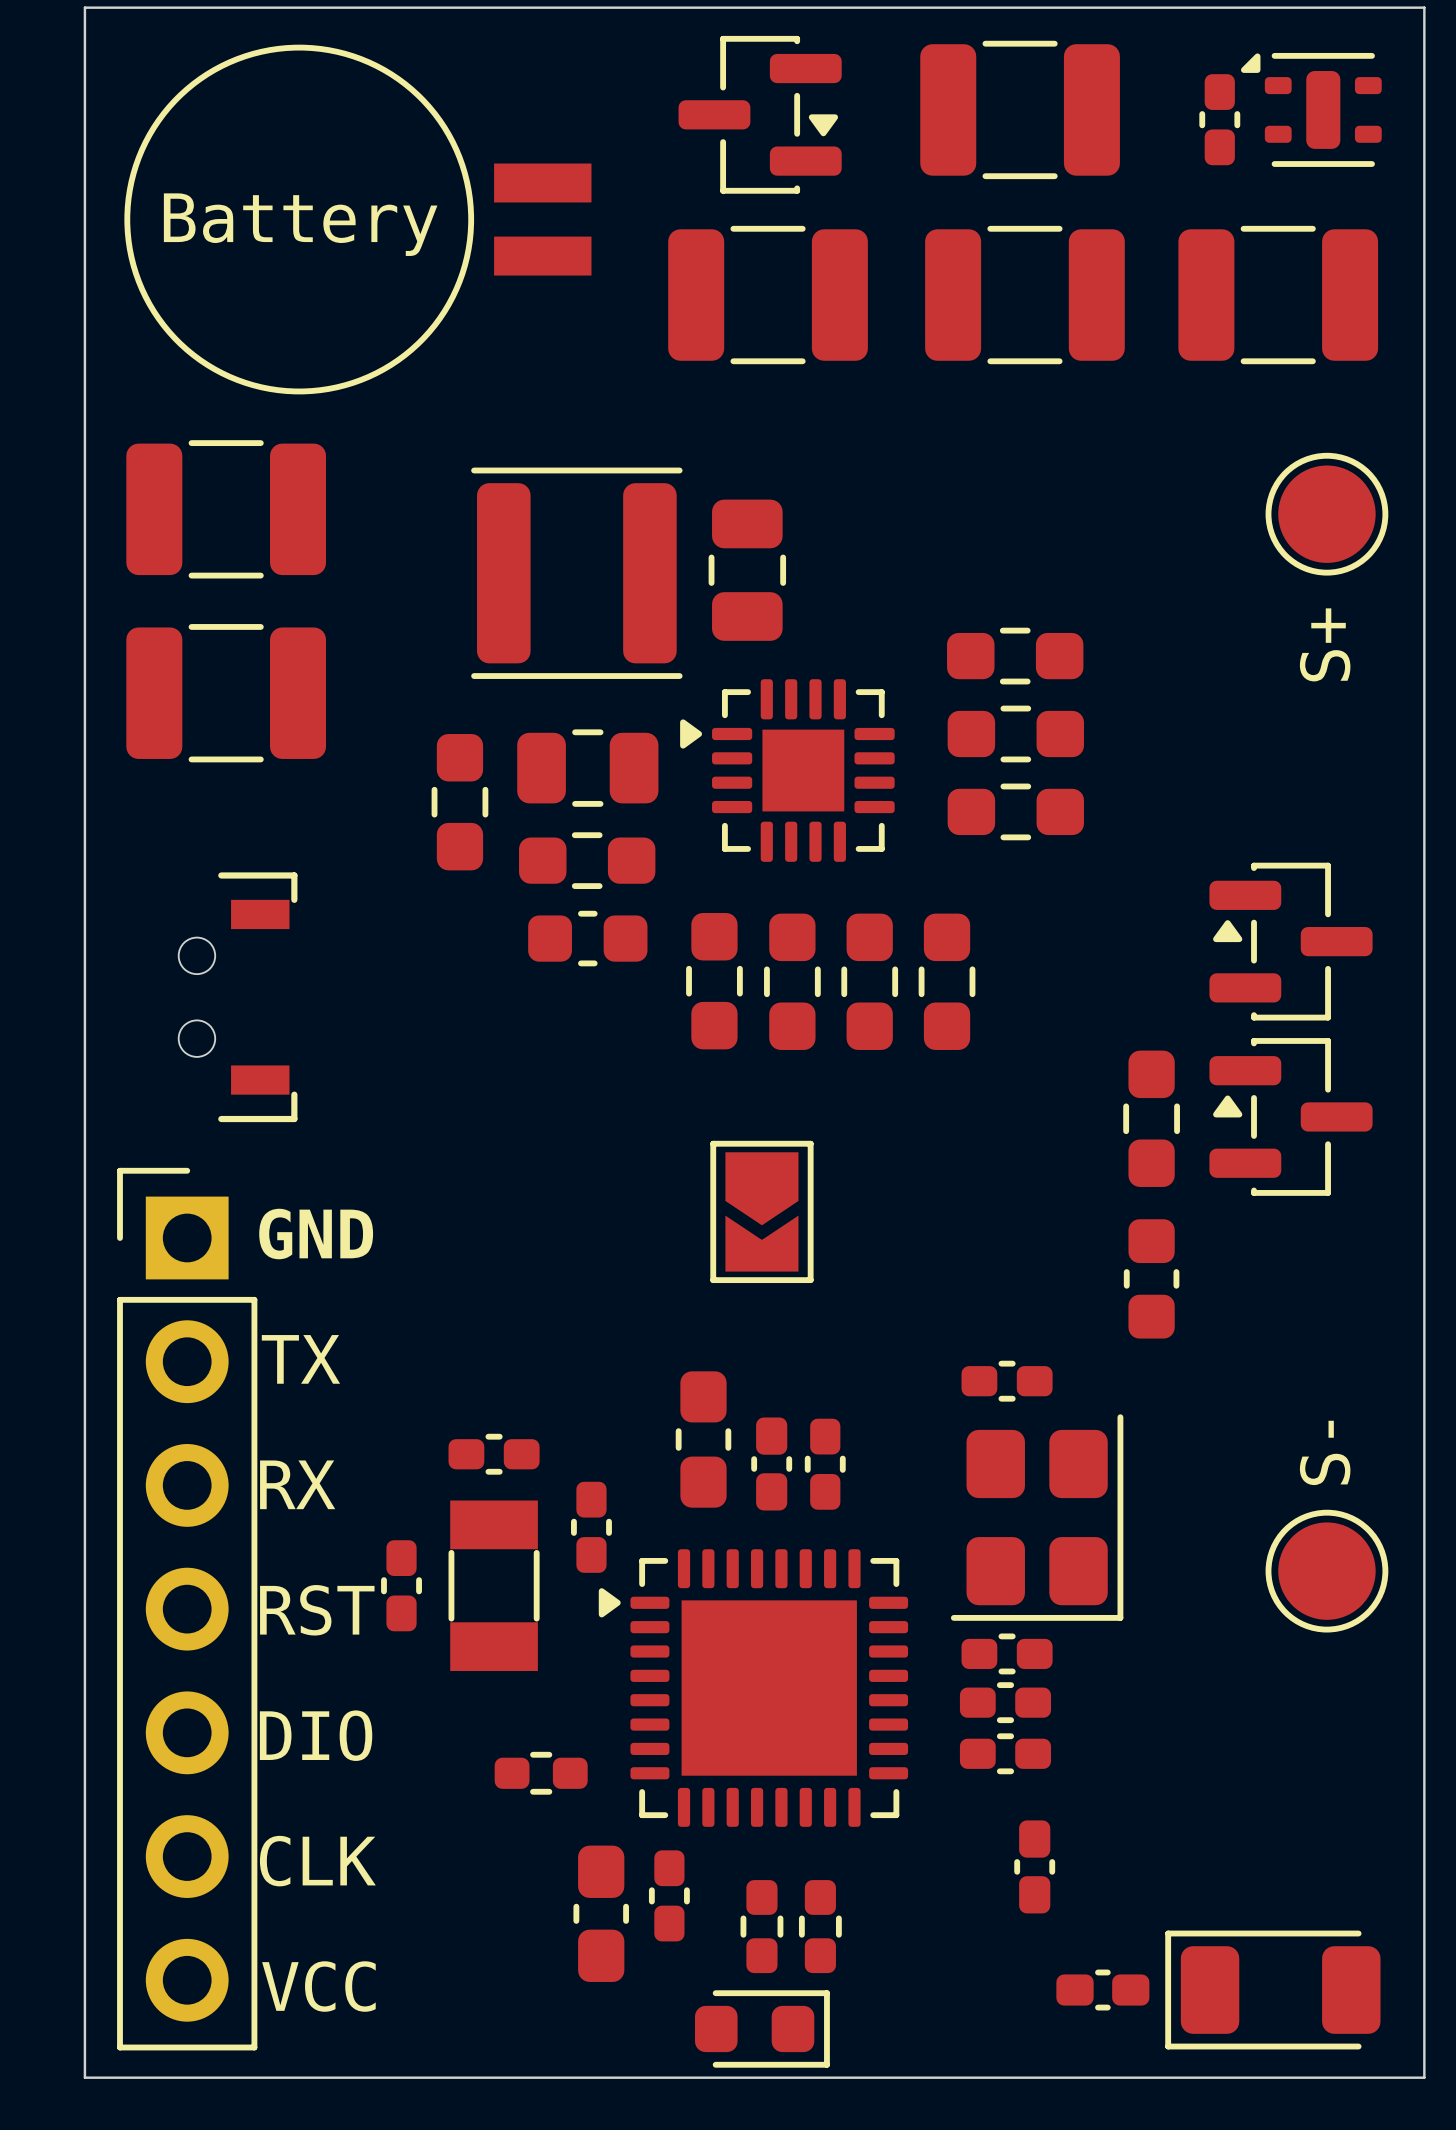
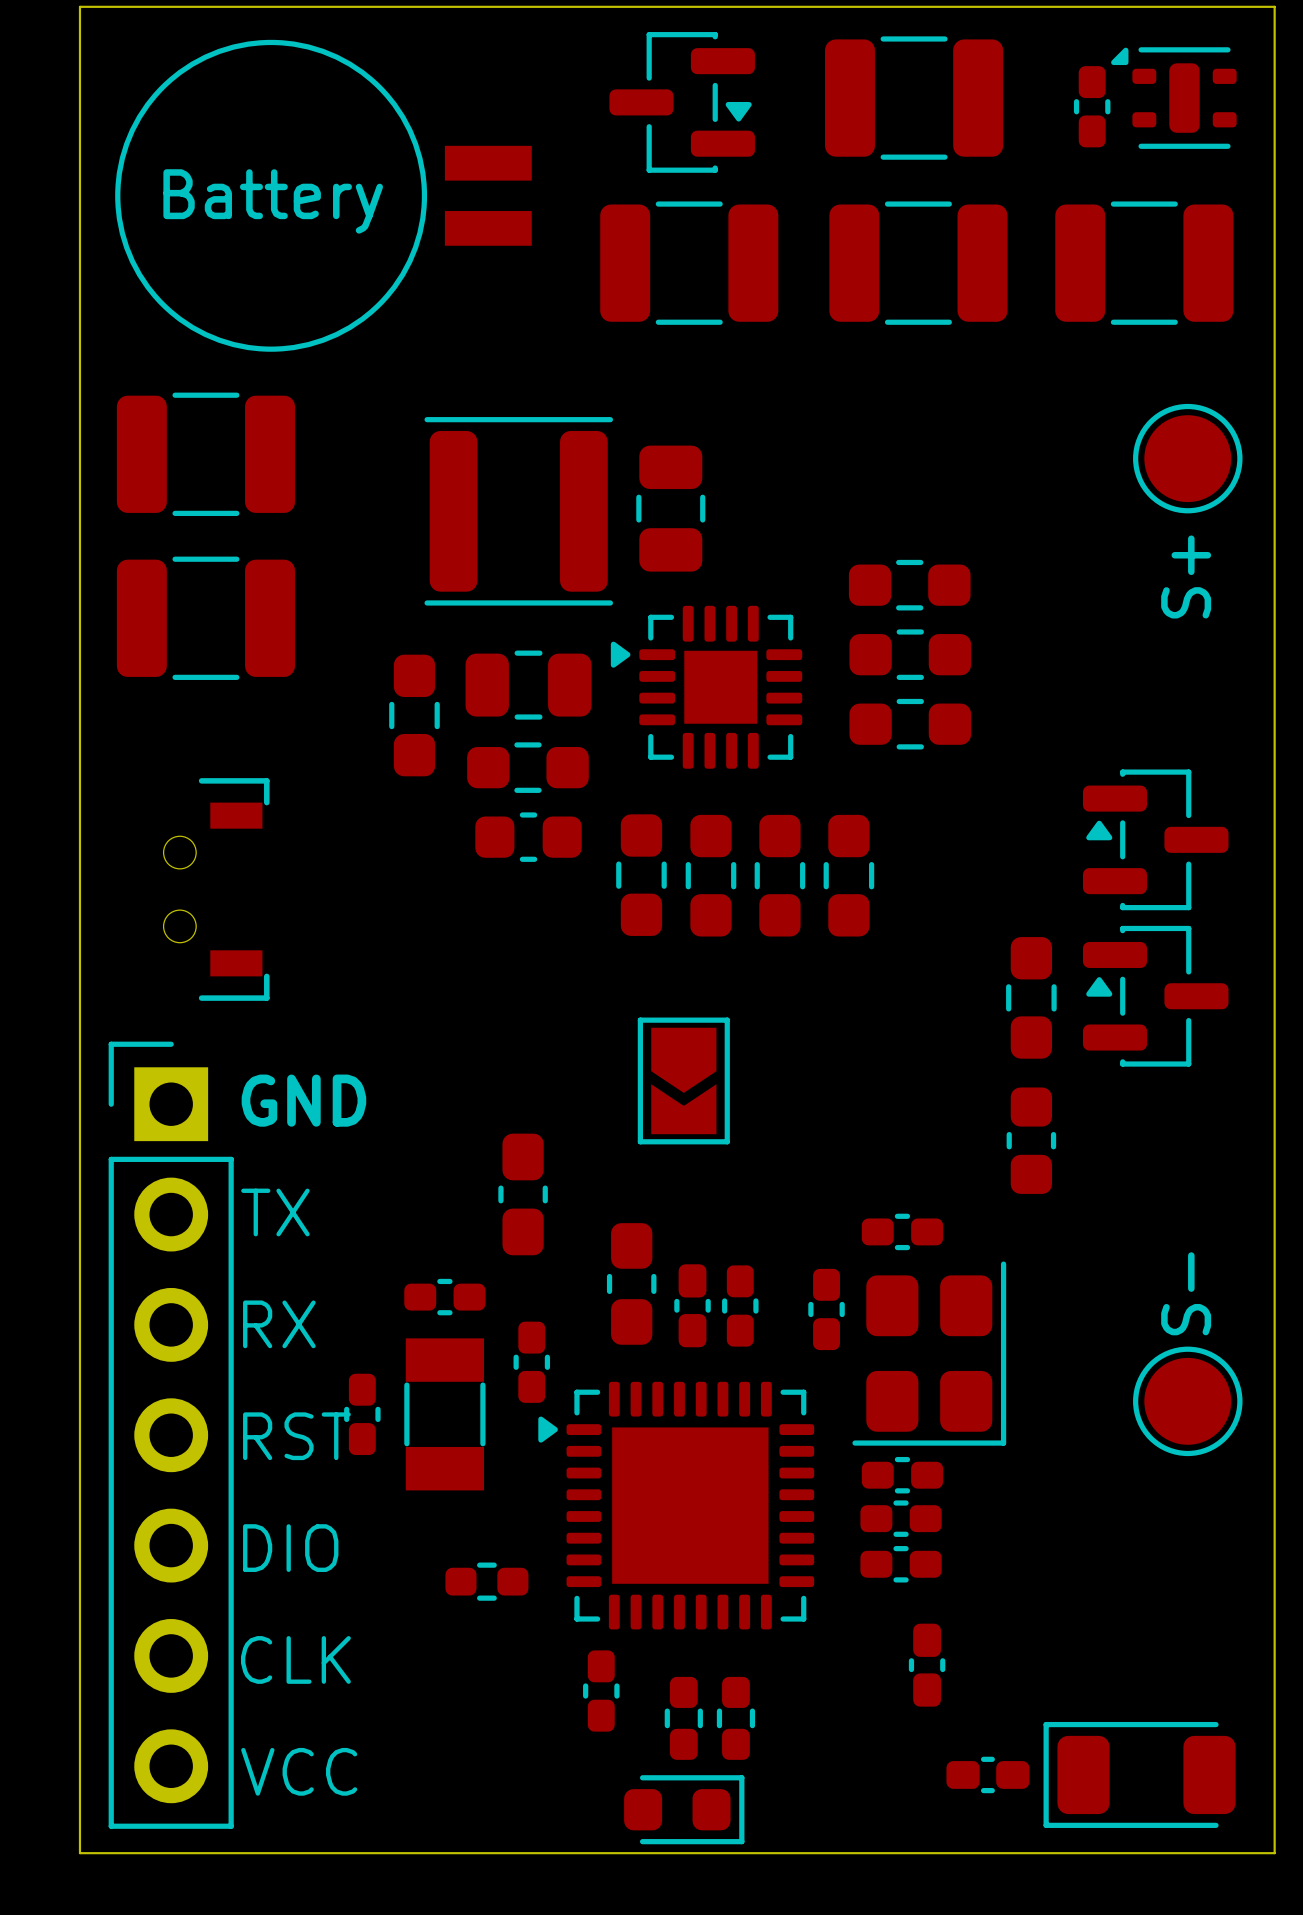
part: none -> (826, 1309)
part position: (601, 1913) -> (523, 1194)

